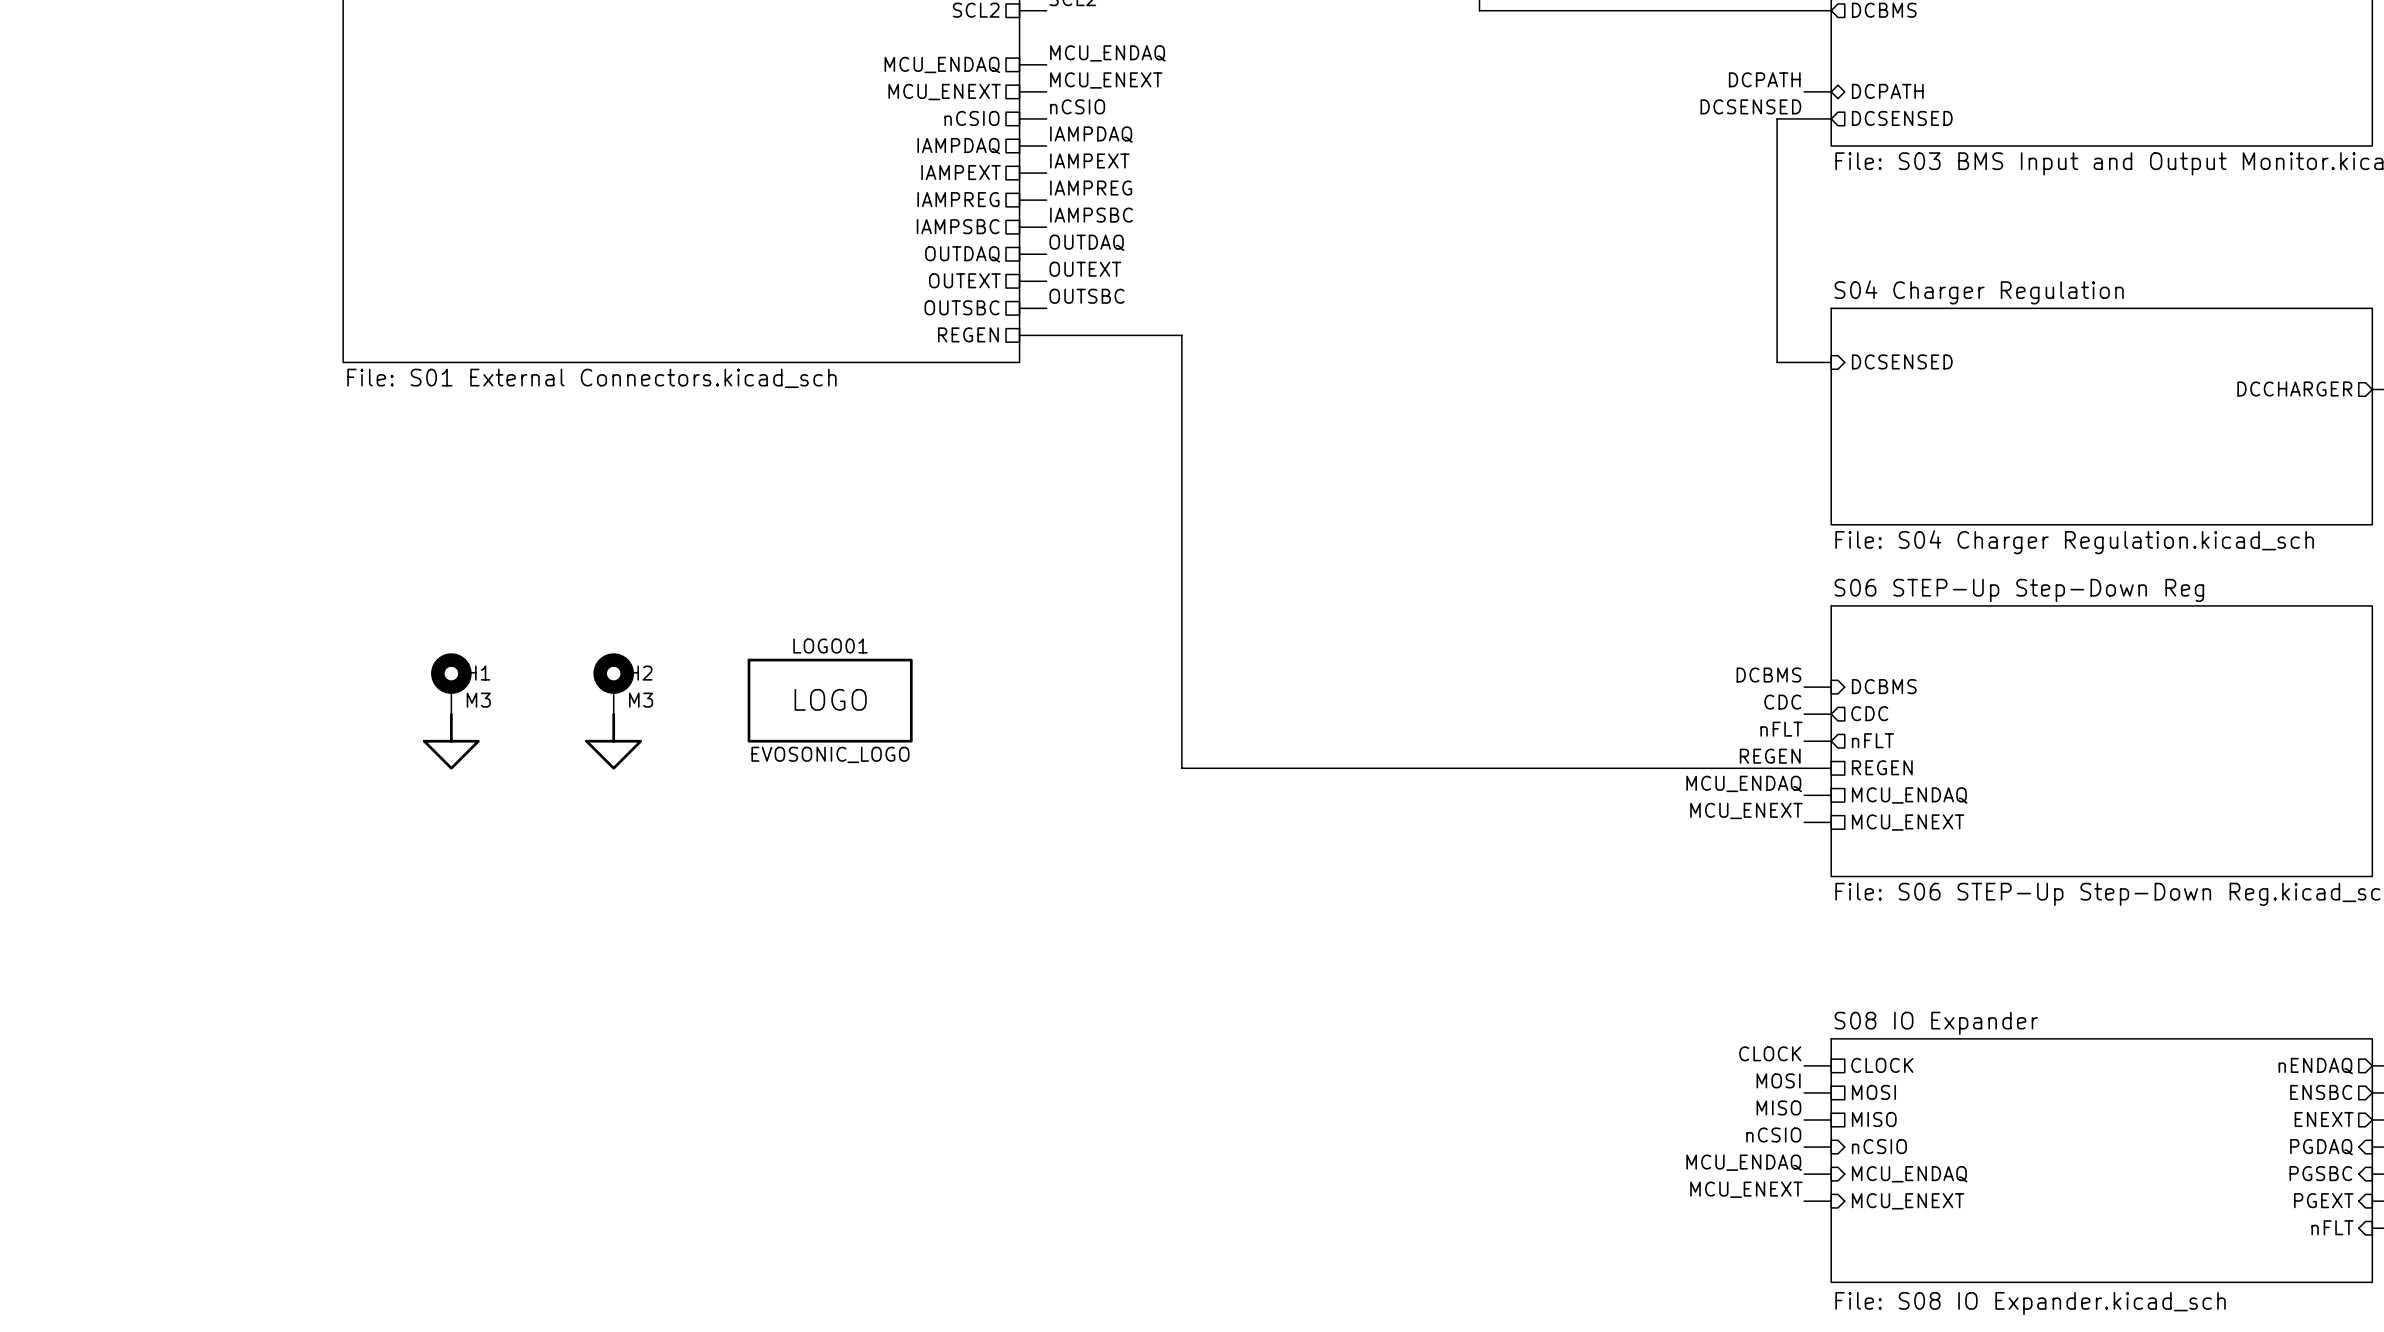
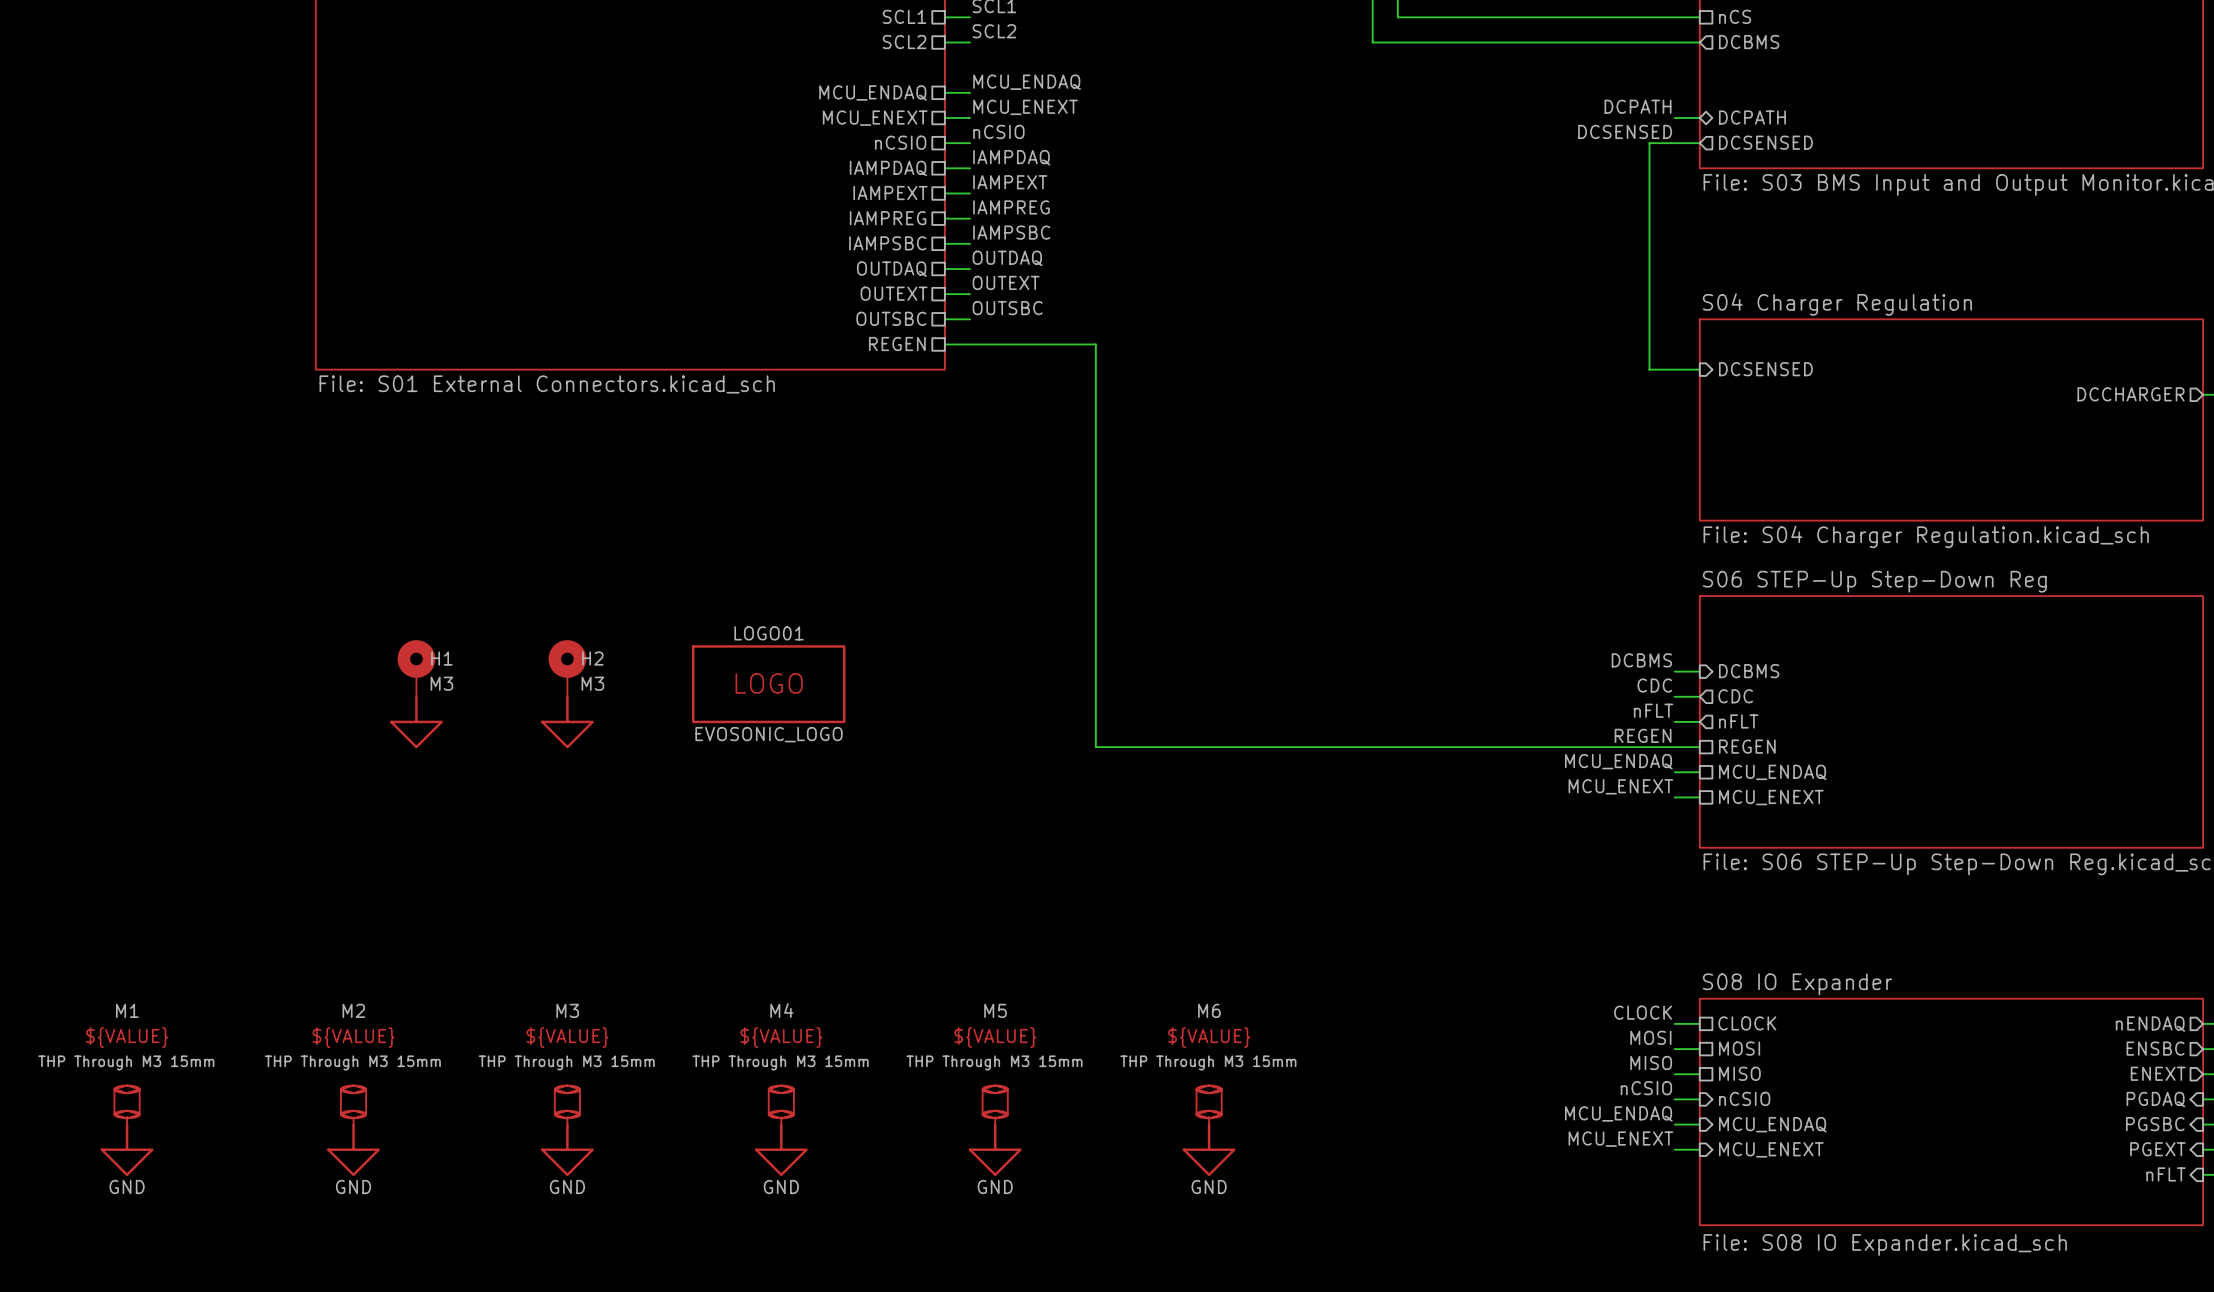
M1: none -> (127, 1105)
M2: none -> (353, 1105)
M3: none -> (567, 1105)
M4: none -> (781, 1105)
M5: none -> (995, 1105)
M6: none -> (1209, 1105)
power symbol: none -> GND (127, 1149)
power symbol: none -> GND (353, 1149)
power symbol: none -> GND (567, 1149)
power symbol: none -> GND (781, 1149)
power symbol: none -> GND (995, 1149)
power symbol: none -> GND (1209, 1149)

